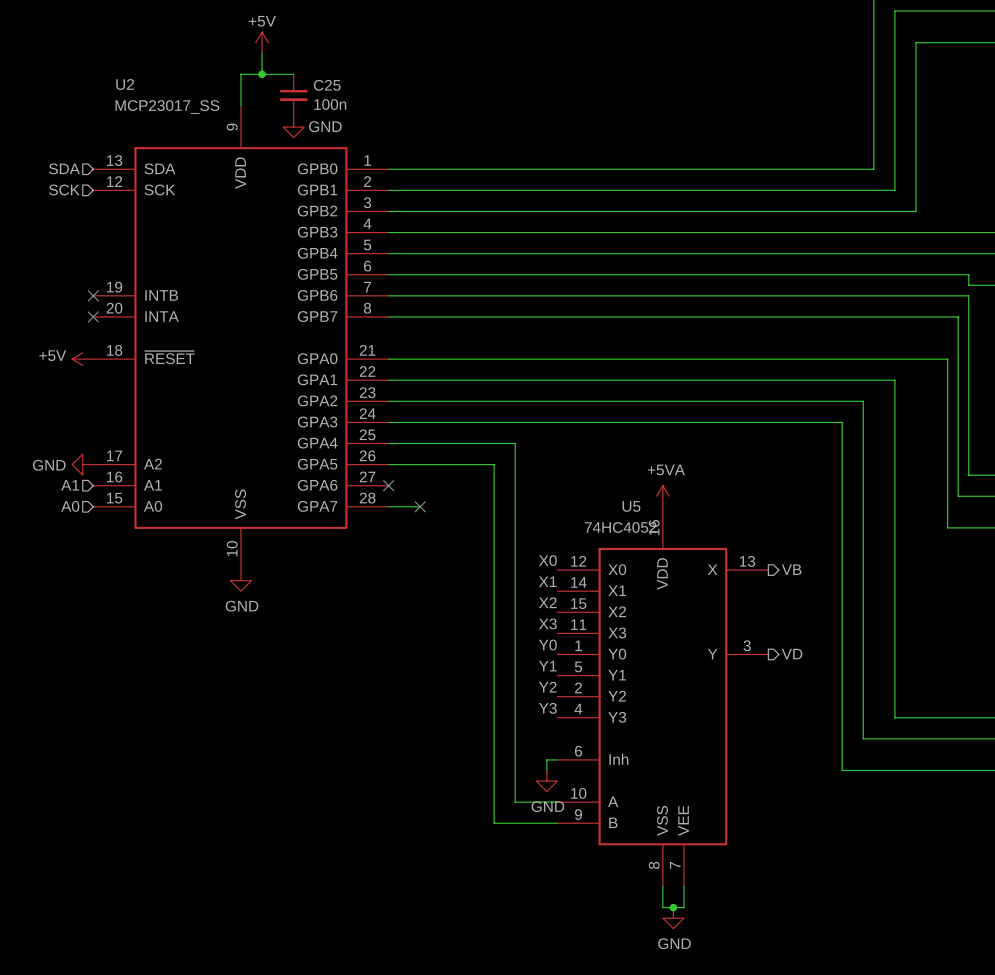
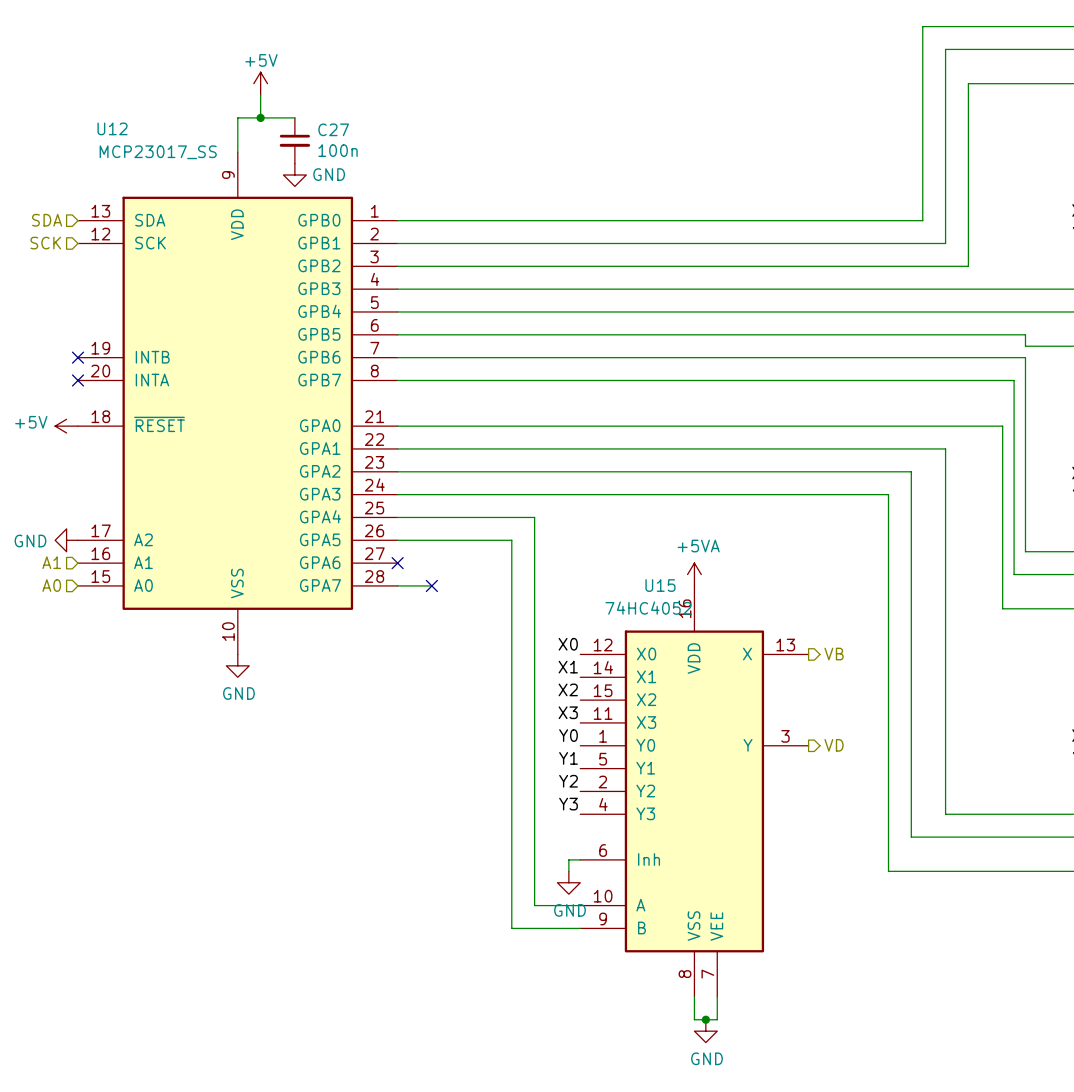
U2 name: U2 (125, 84) -> U12 (112, 128)
C25 name: C25 (327, 85) -> C27 (333, 129)
U5 name: U5 (631, 506) -> U15 (660, 585)

